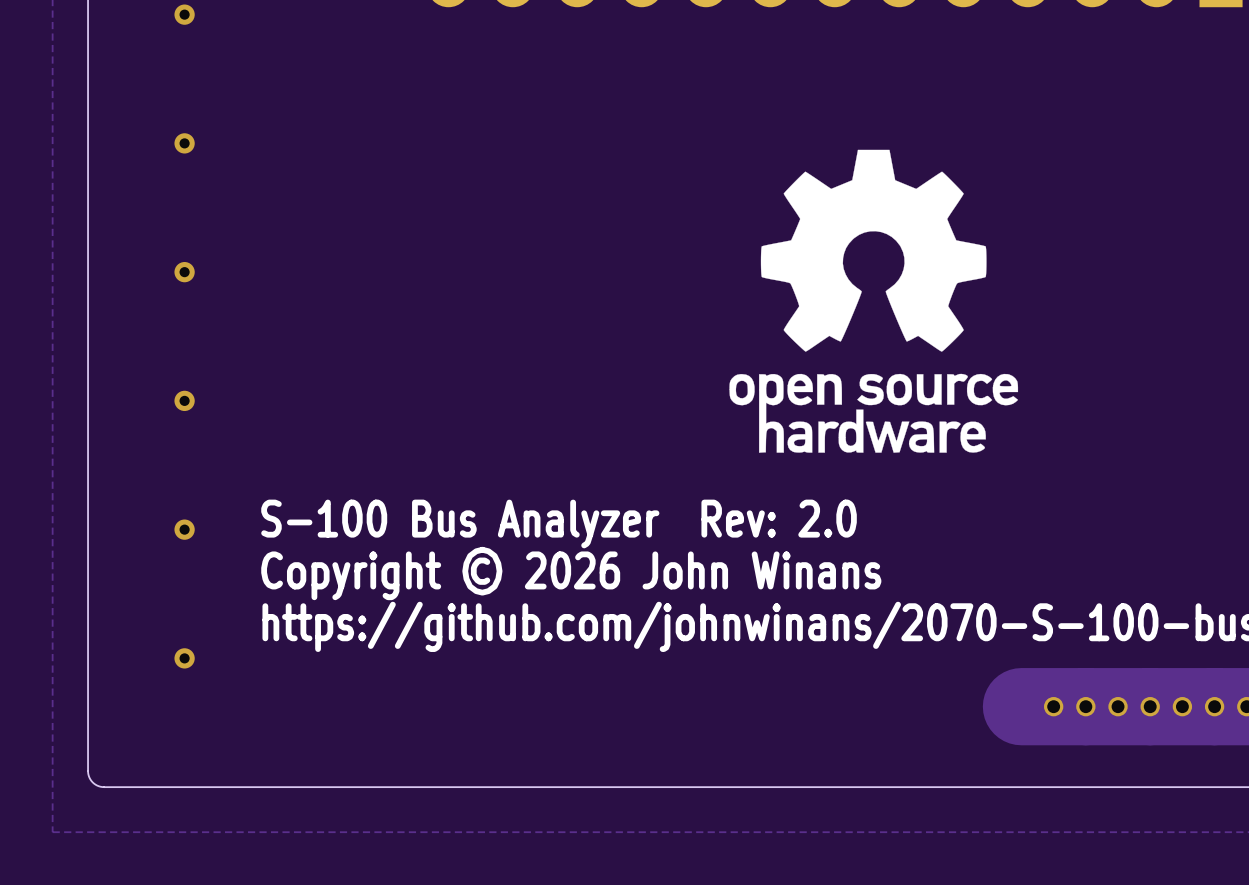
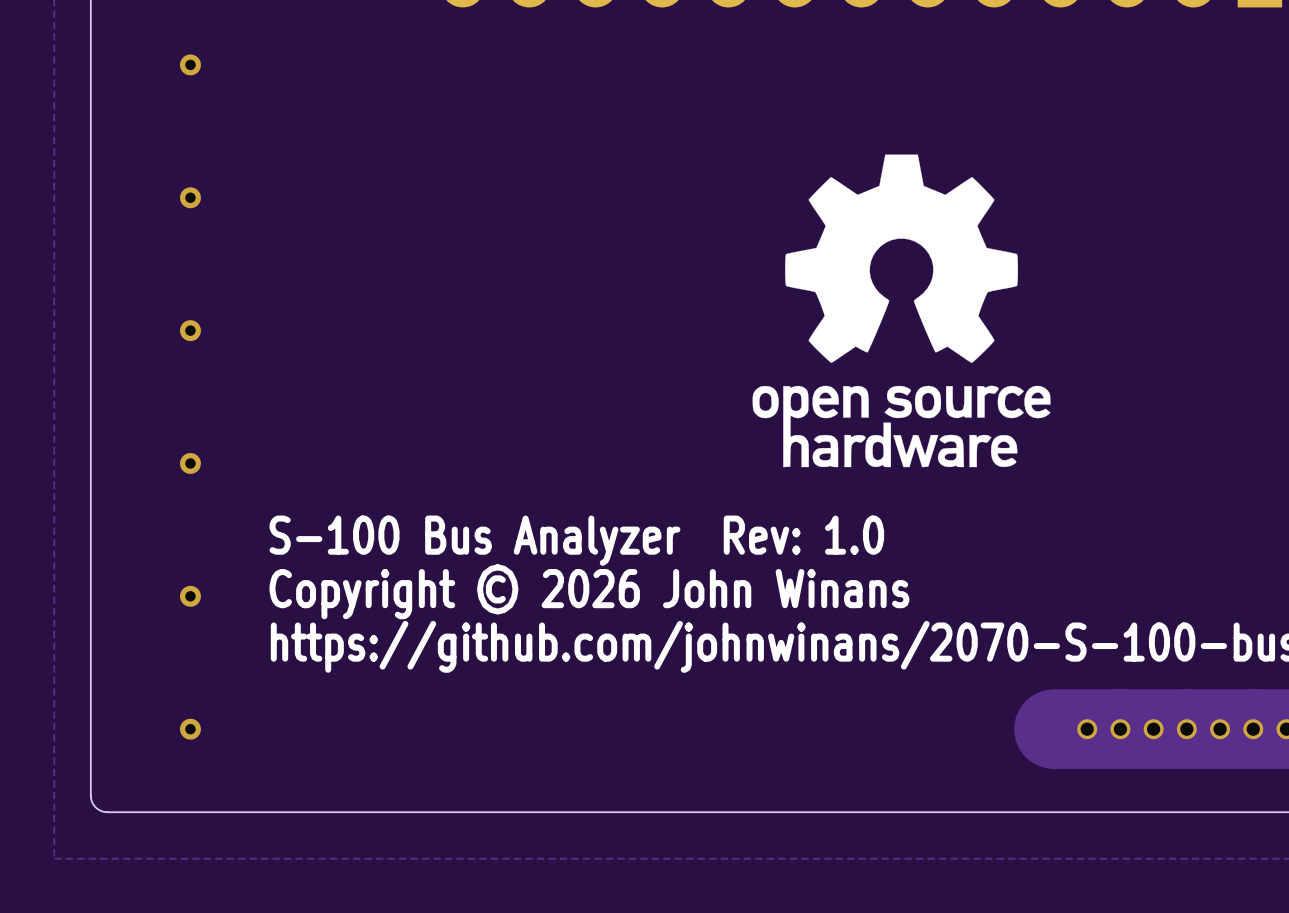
via: (184, 14) -> none
via: none -> (190, 64)
via: (184, 143) -> none
via: none -> (190, 197)
via: (184, 272) -> none
via: none -> (190, 330)
via: (184, 400) -> none
via: none -> (190, 463)
text: S-100 Bus Analyzer Rev: 2.0 (559, 523) -> S-100 Bus Analyzer Rev: 1.0 (576, 540)
via: (184, 529) -> none
via: none -> (190, 596)
via: (184, 658) -> none
via: none -> (190, 729)

